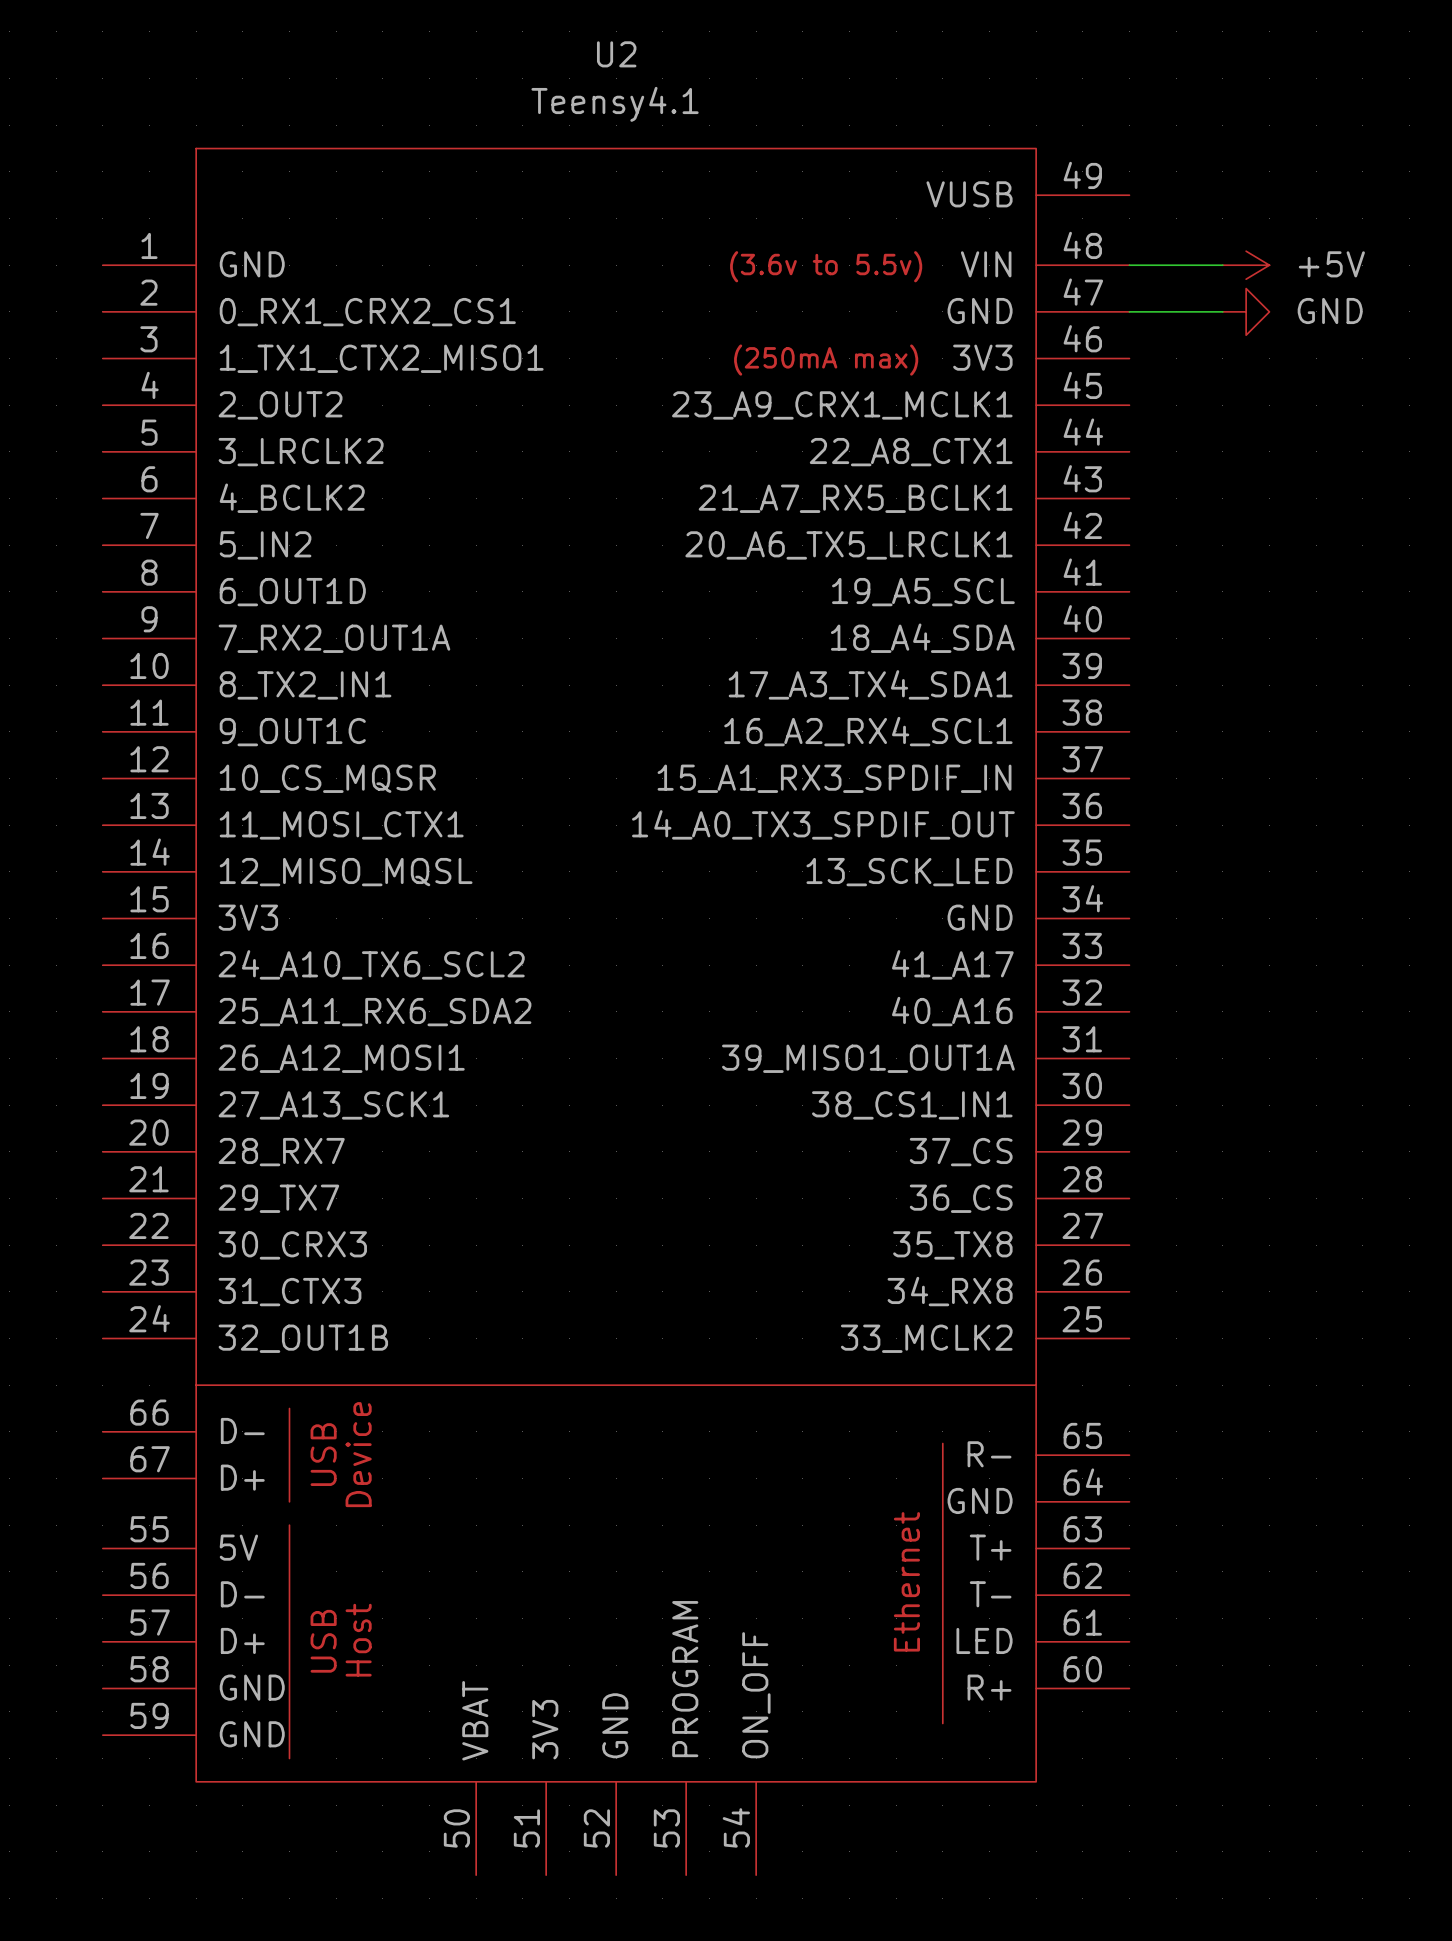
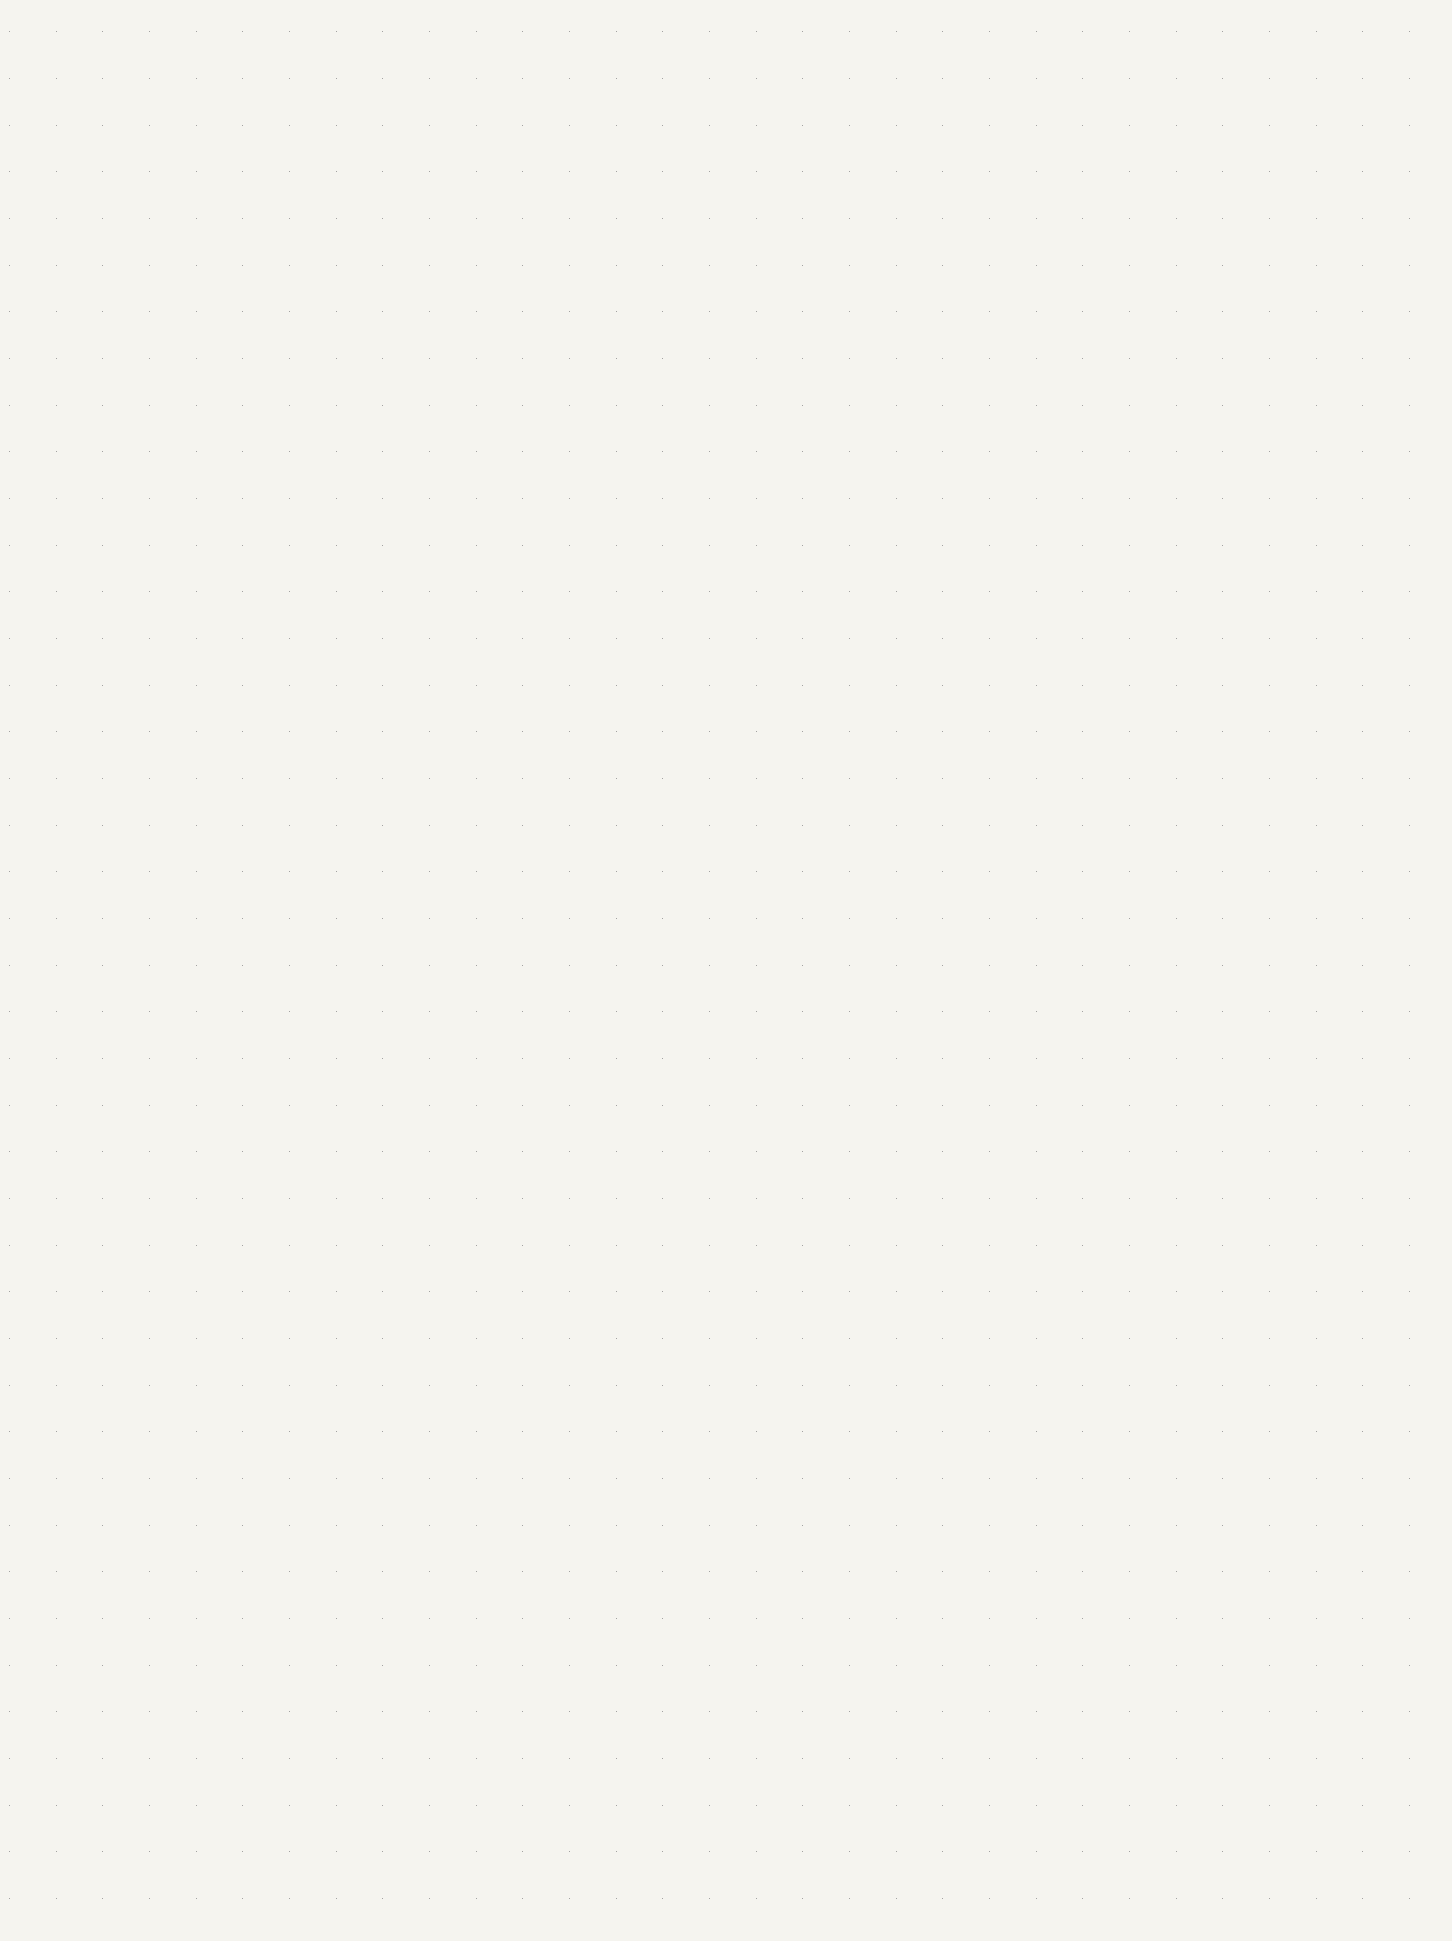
wire: (1129, 265) (1222, 265) -> none
power symbol: +5V (1246, 265) -> none
wire: (1129, 311) (1222, 311) -> none
power symbol: GND (1246, 311) -> none
U2: Teensy4.1 (616, 1011) -> none

